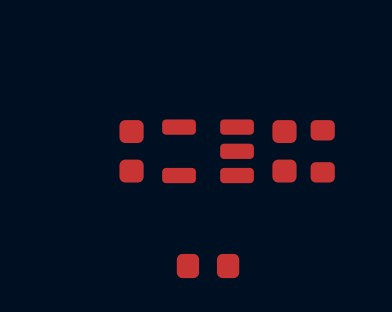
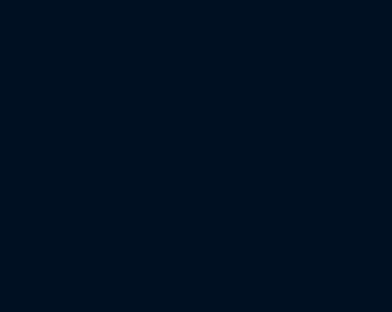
part: (131, 151) -> none
part: (208, 151) -> none
part: (284, 151) -> none
part: (322, 151) -> none
part: (208, 266) -> none

